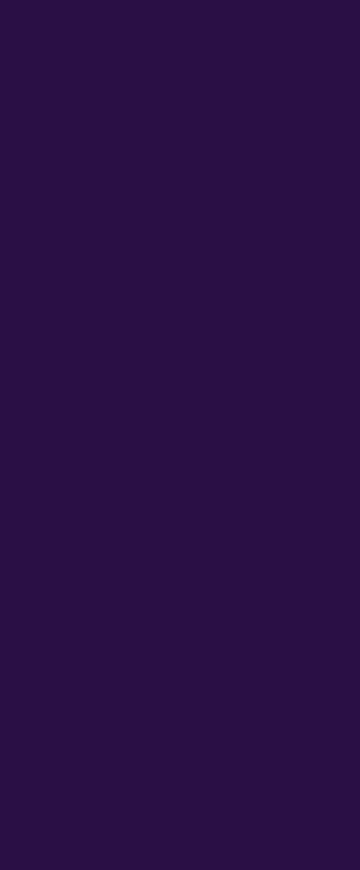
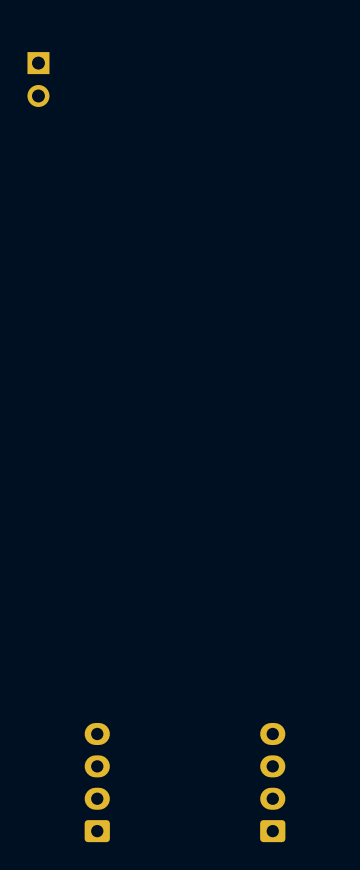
part: none -> (38, 79)
part: none -> (97, 782)
part: none -> (272, 782)

